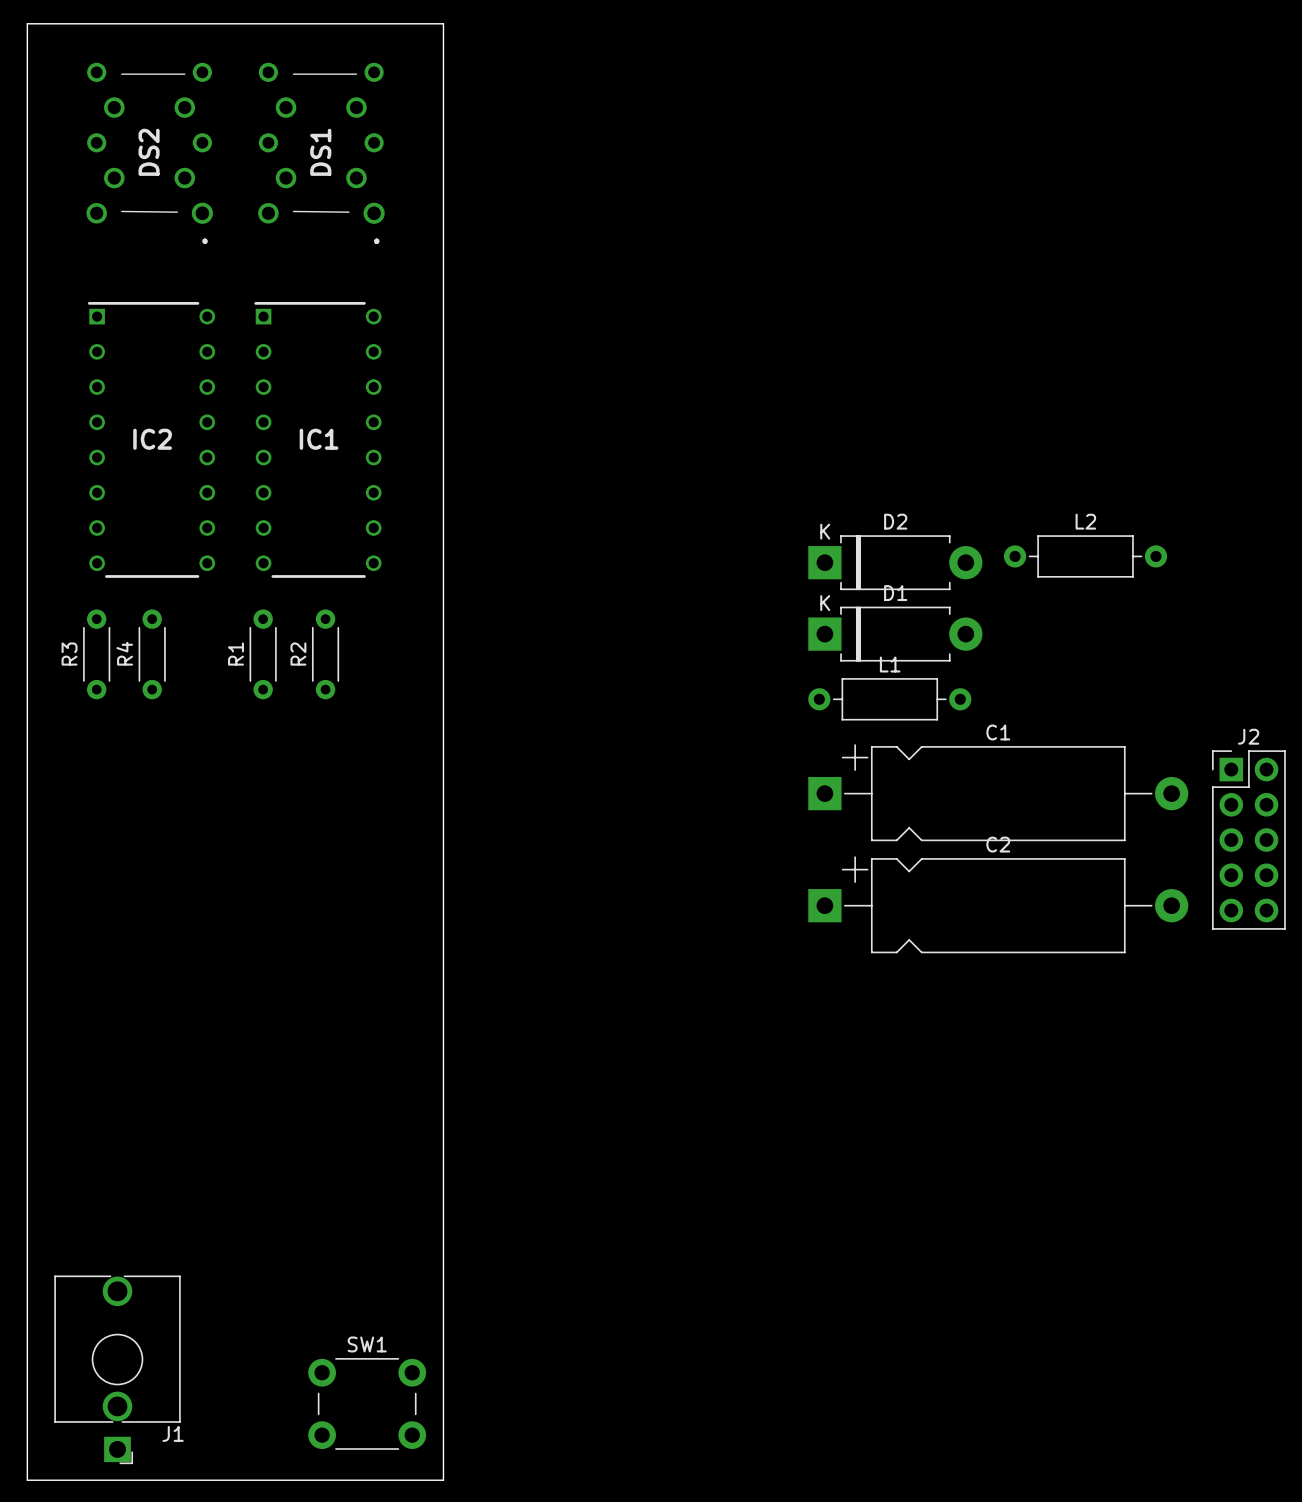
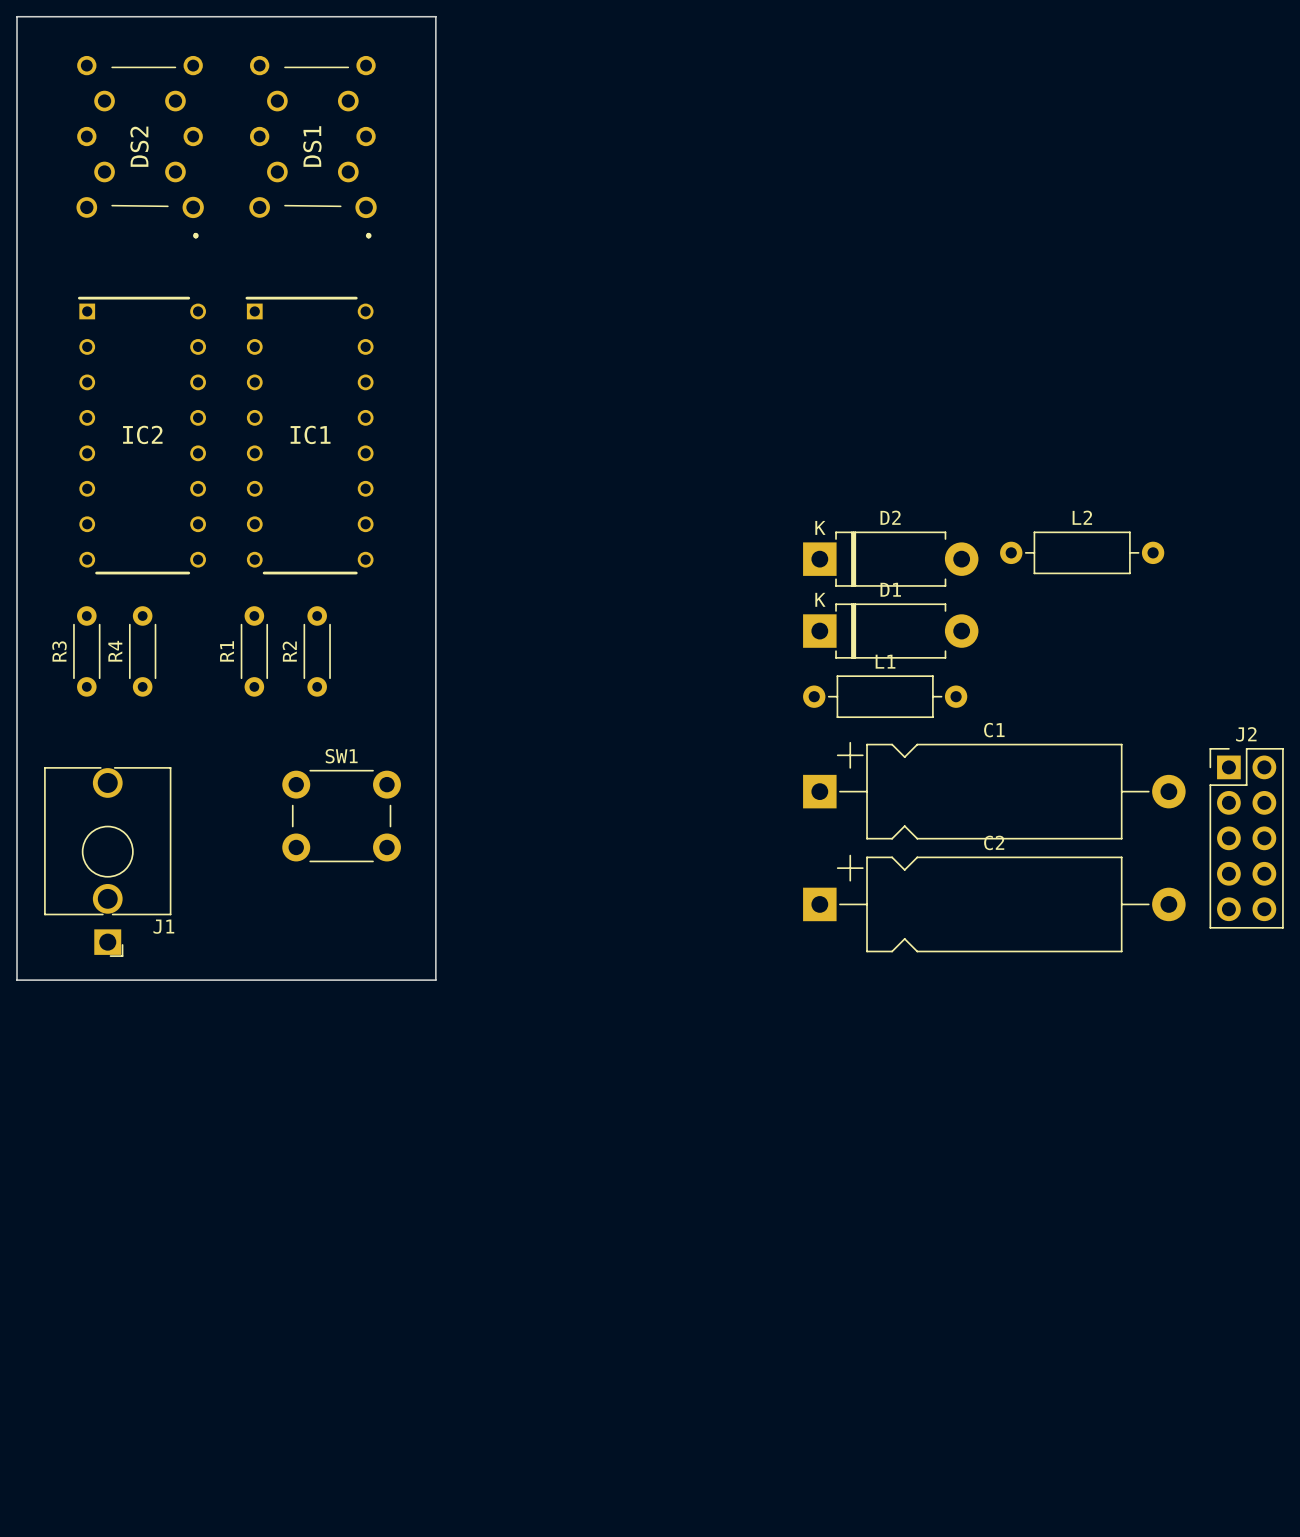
board edge: (27, 980) (27, 1480) (443, 1480) (443, 980) -> (17, 980) (435, 980)
J1 position: (117, 1369) -> (107, 861)
SW1 position: (367, 1403) -> (341, 816)

